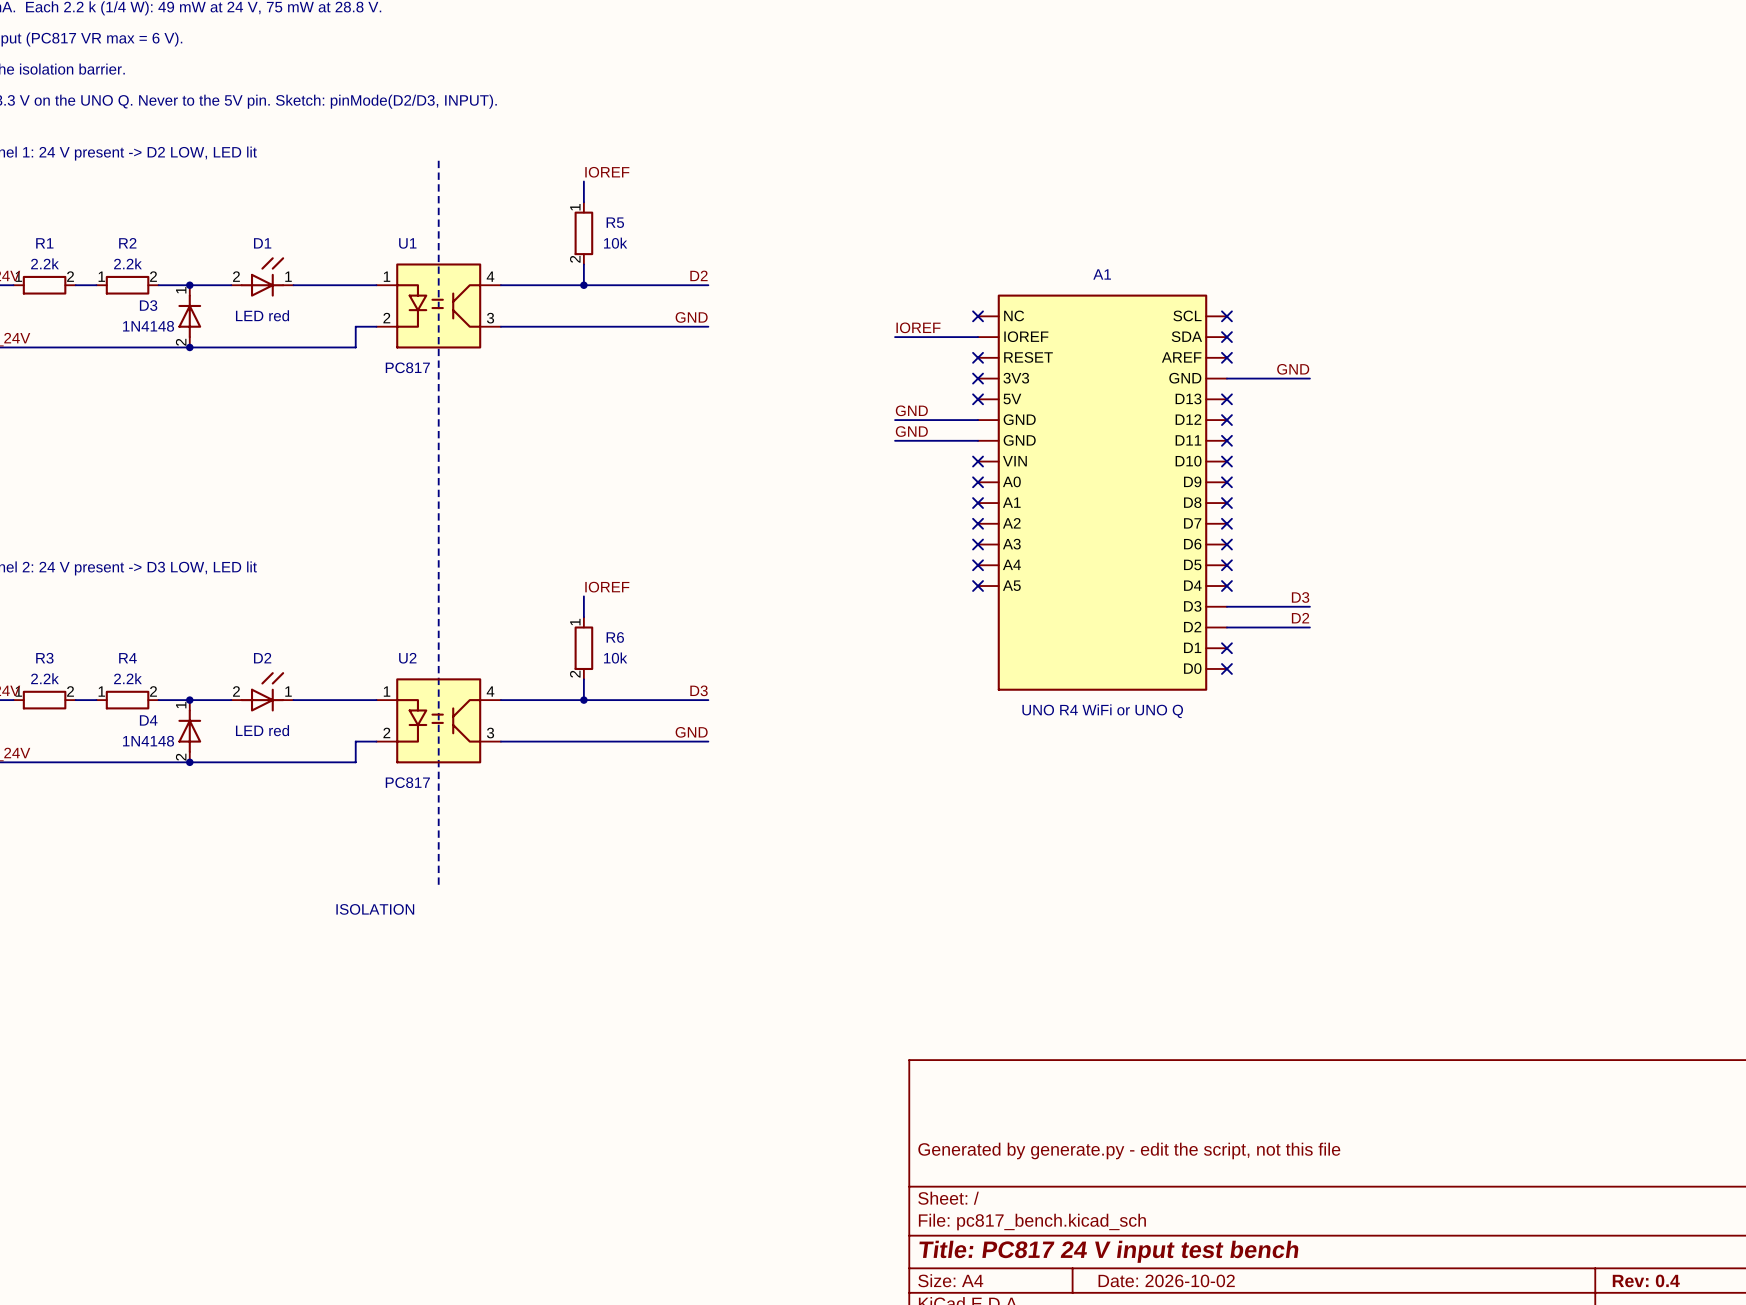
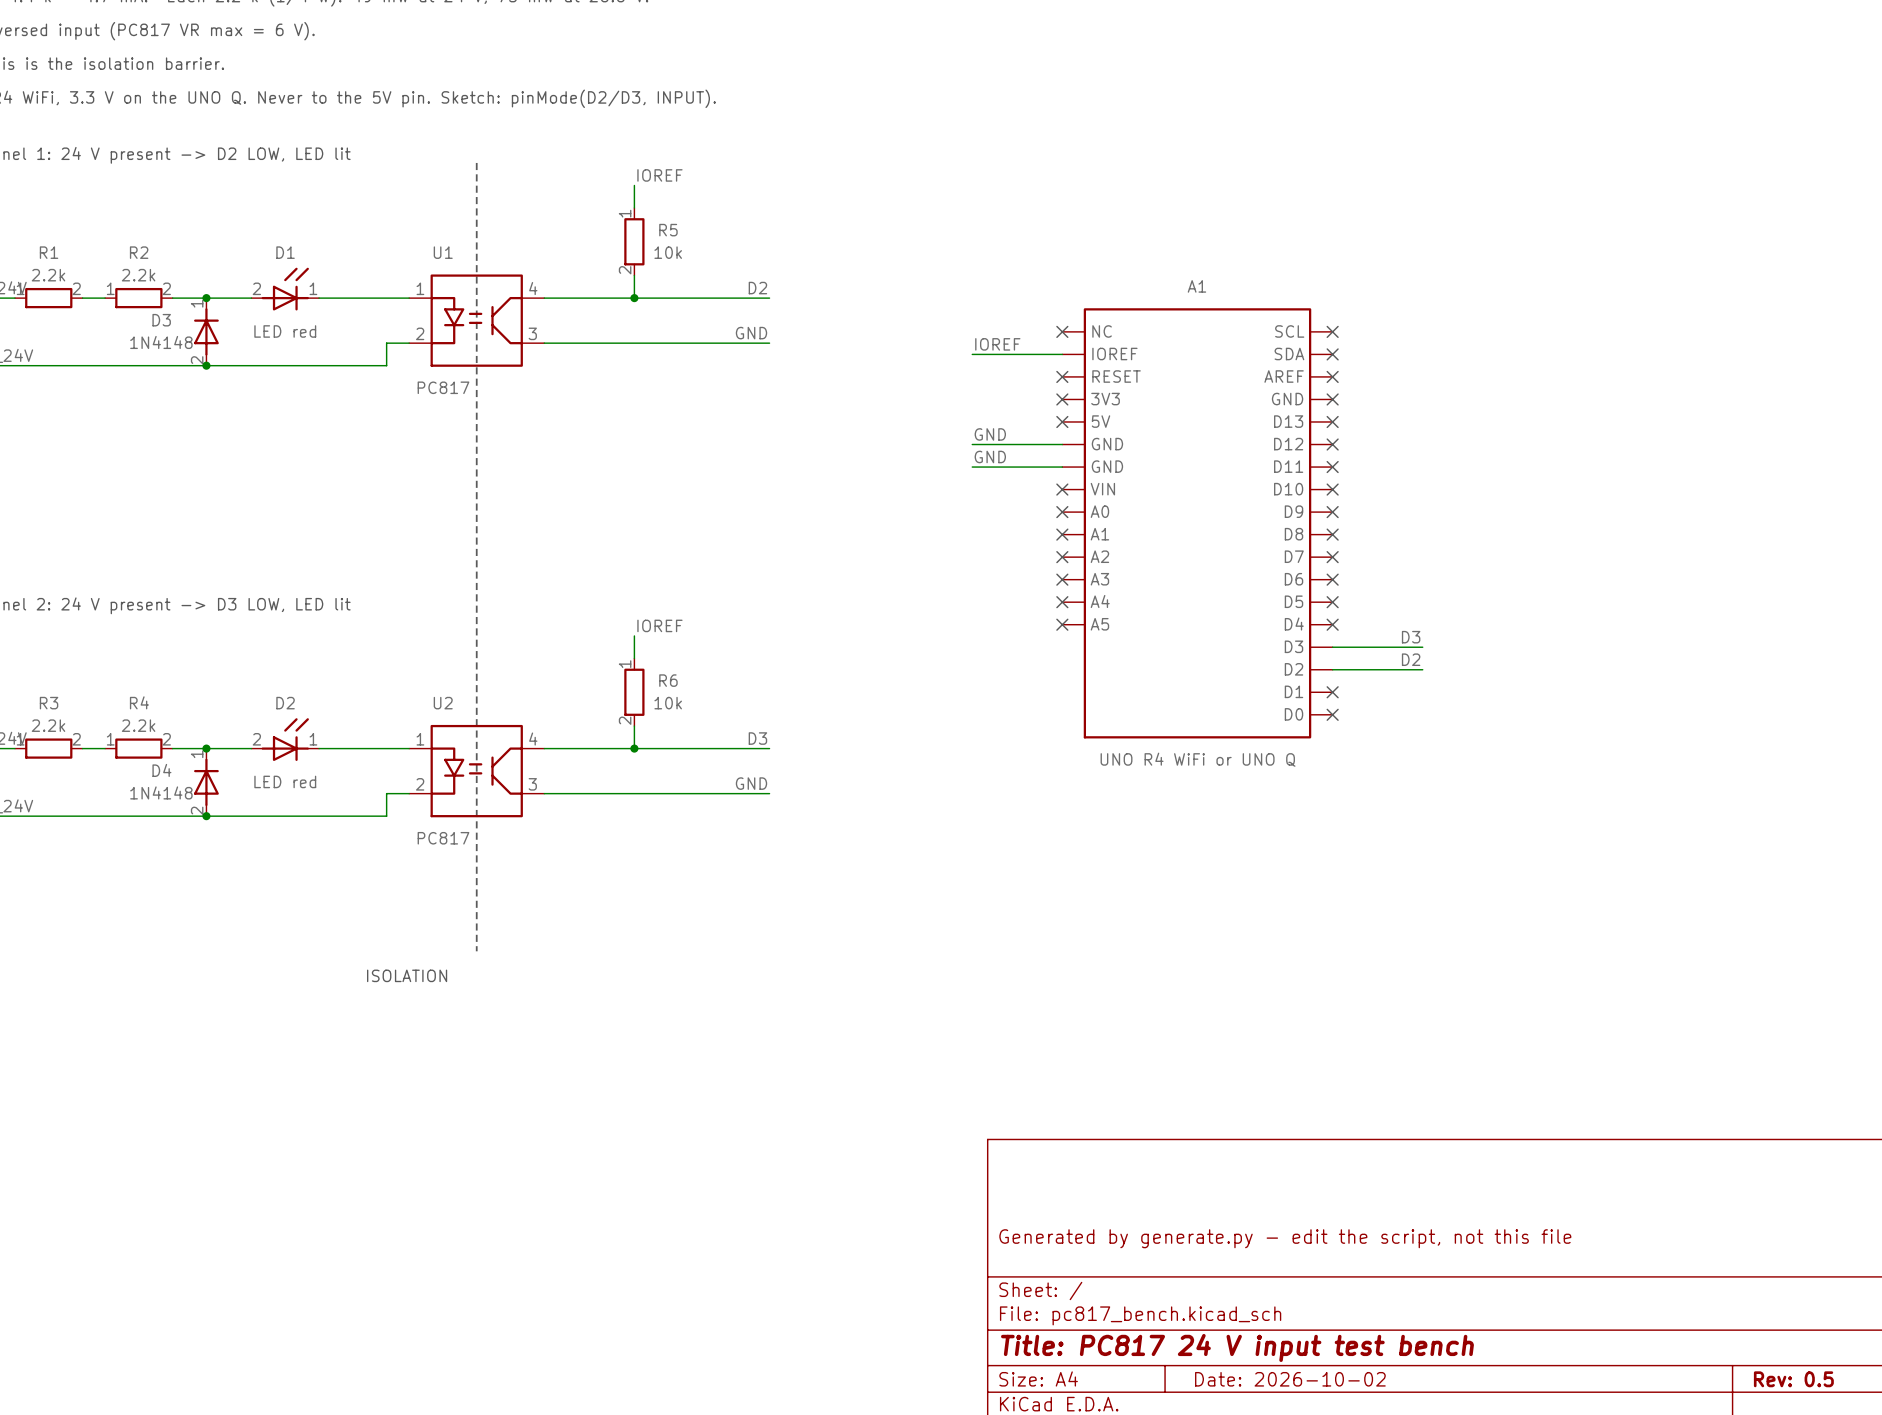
label: GND (1293, 369) -> none
wire: (1226, 378) (1309, 378) -> none
no-connect mark: none -> (1332, 399)
title block: Rev: 0.4 (1646, 1280) -> Rev: 0.5 (1793, 1379)

